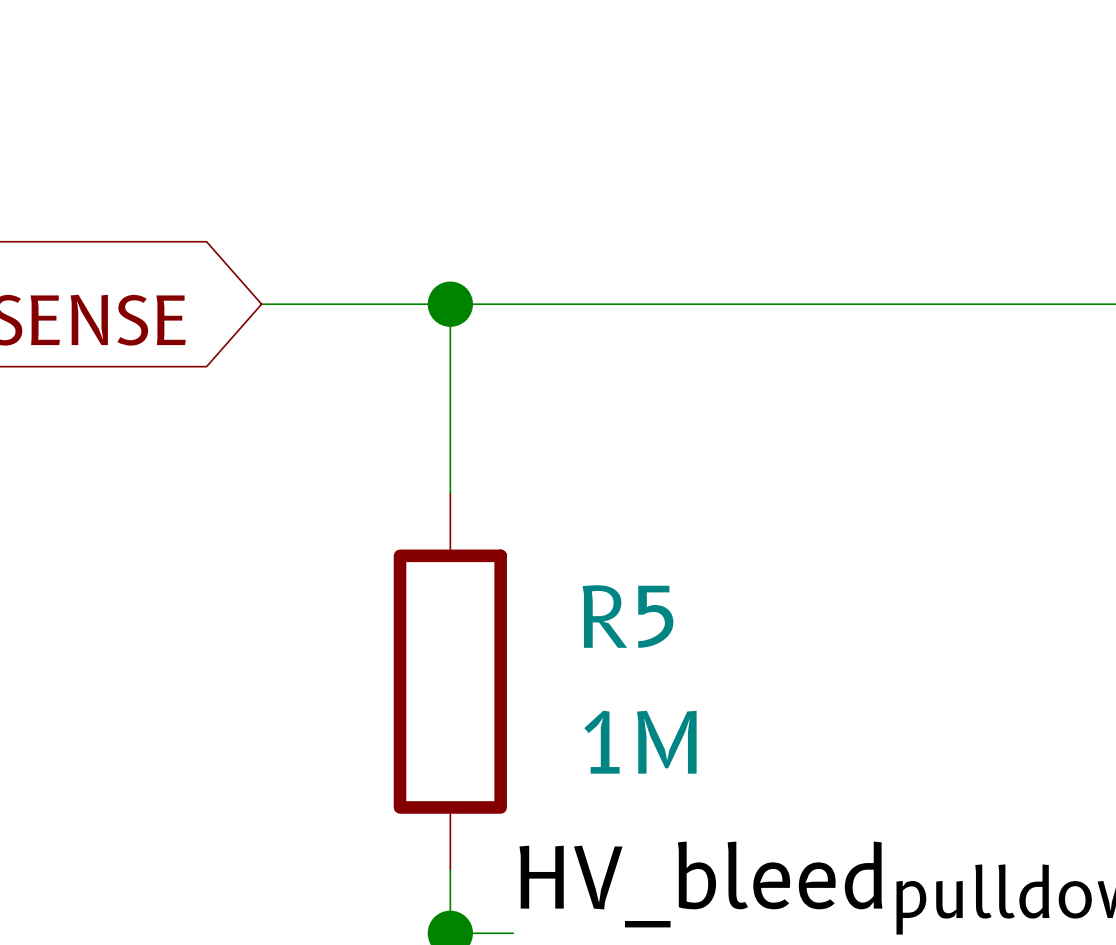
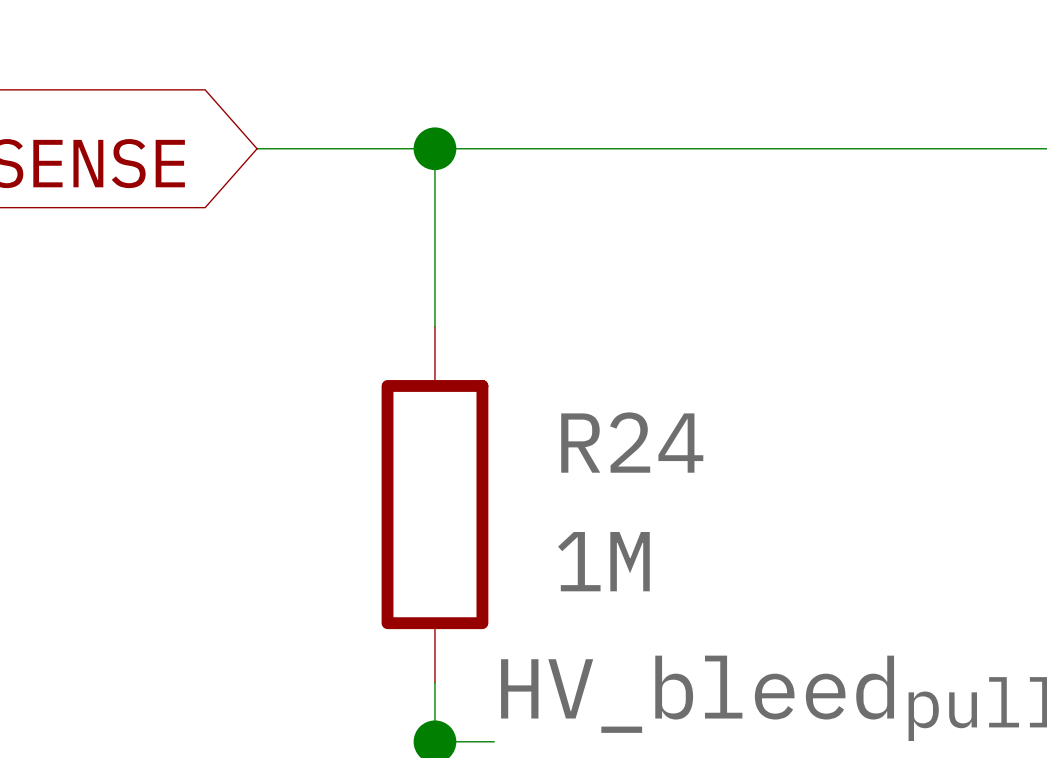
R5 name: R5 (627, 616) -> R24 (632, 442)

